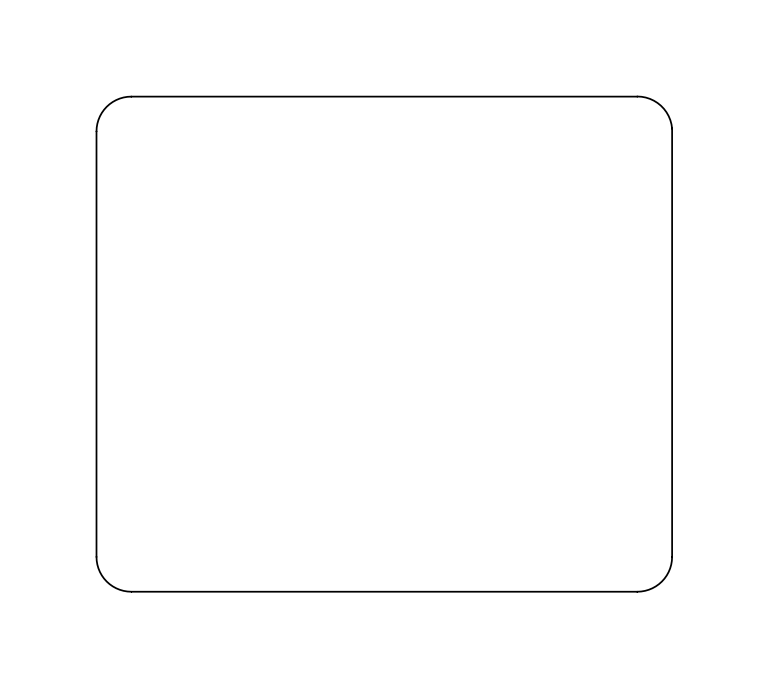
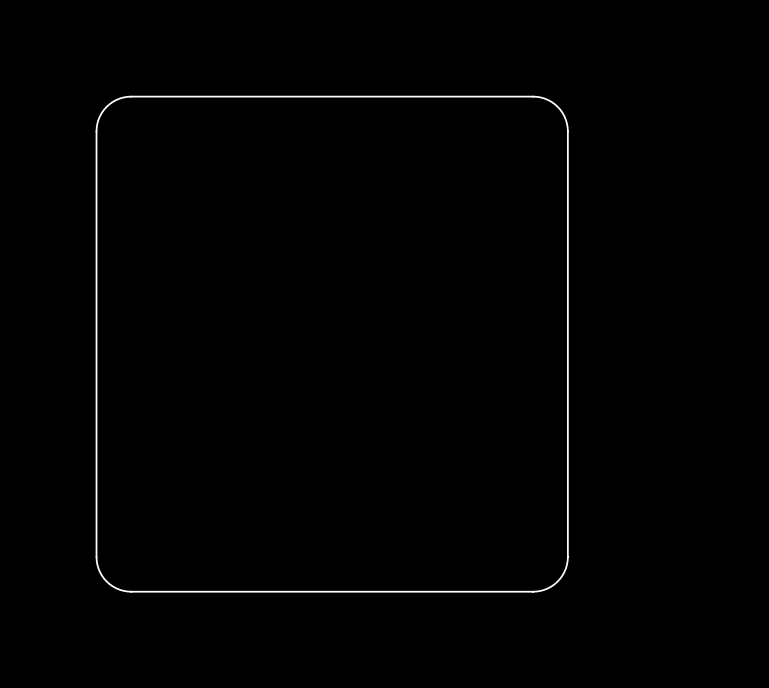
board edge: (533, 96) (645, 97) (657, 103) (663, 108) (671, 124) (672, 556) (670, 568) (664, 578) (652, 588) (637, 591) (131, 591) -> (533, 96) (544, 98) (554, 104) (562, 112) (567, 127) (567, 556) (565, 568) (560, 578) (548, 588) (533, 591) (131, 591)

